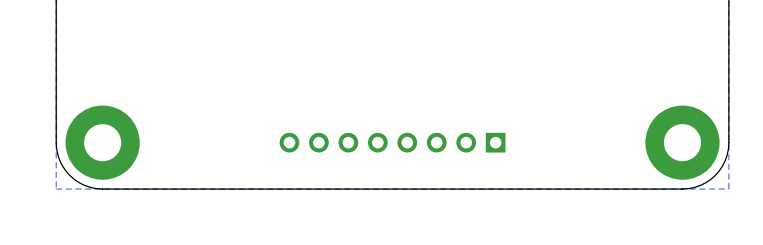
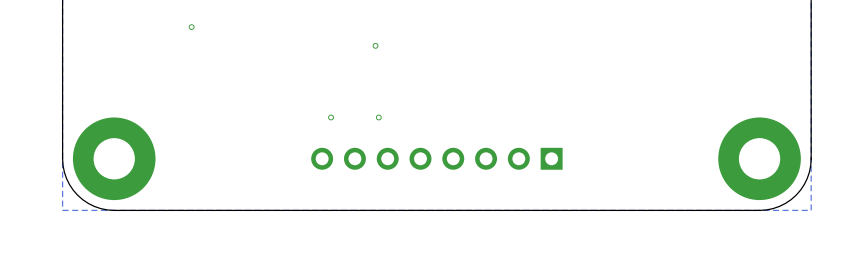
via: none -> (191, 27)
via: none -> (375, 45)
via: none -> (331, 117)
via: none -> (378, 117)

